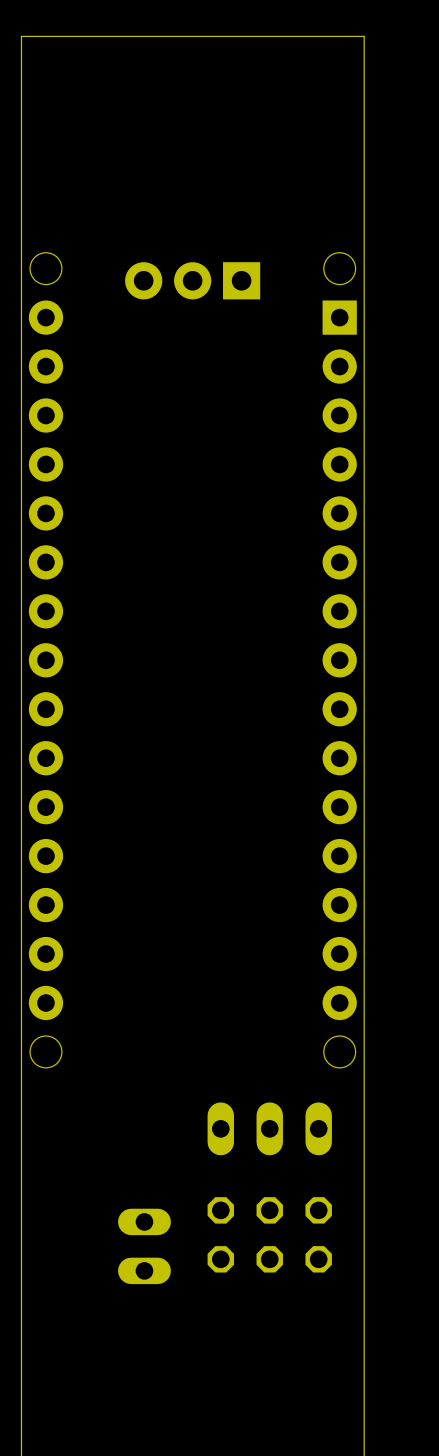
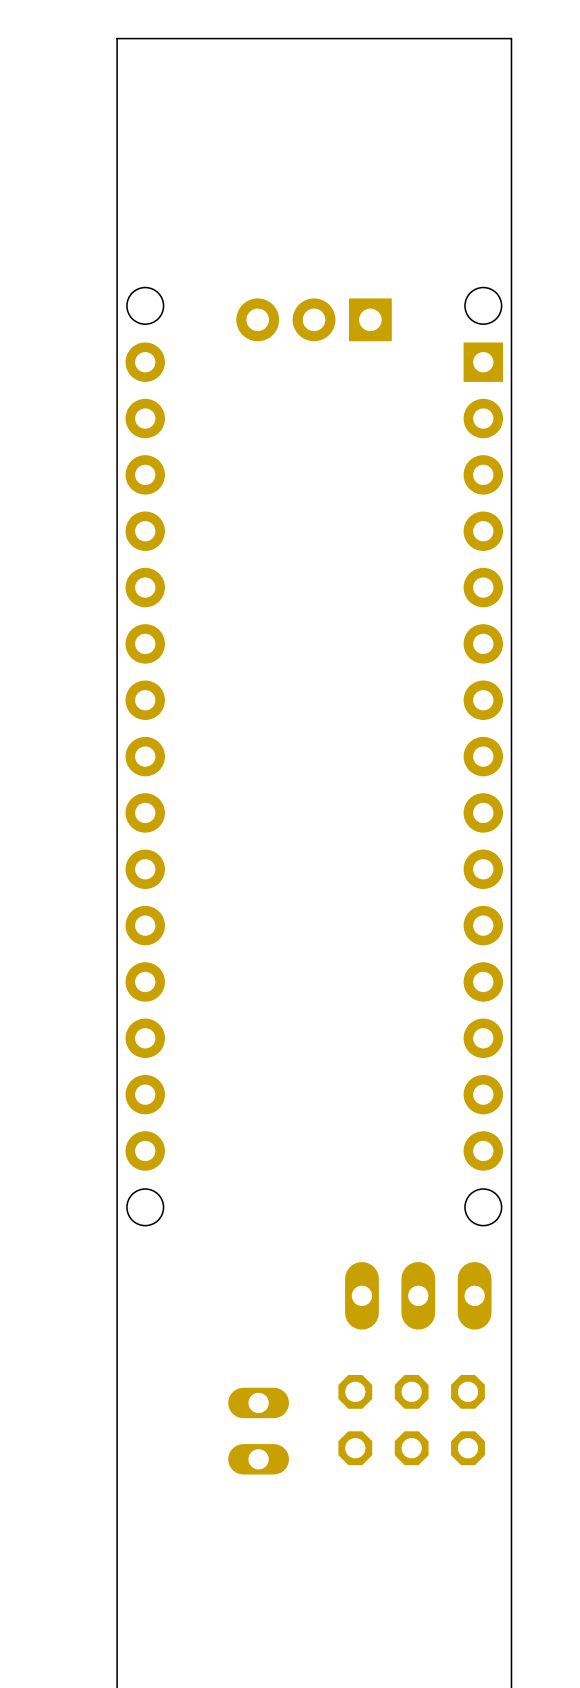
part footprint: [207, 1102, 332, 1156] -> [345, 1262, 492, 1330]
part footprint: [207, 1197, 332, 1273] -> [338, 1374, 485, 1466]

